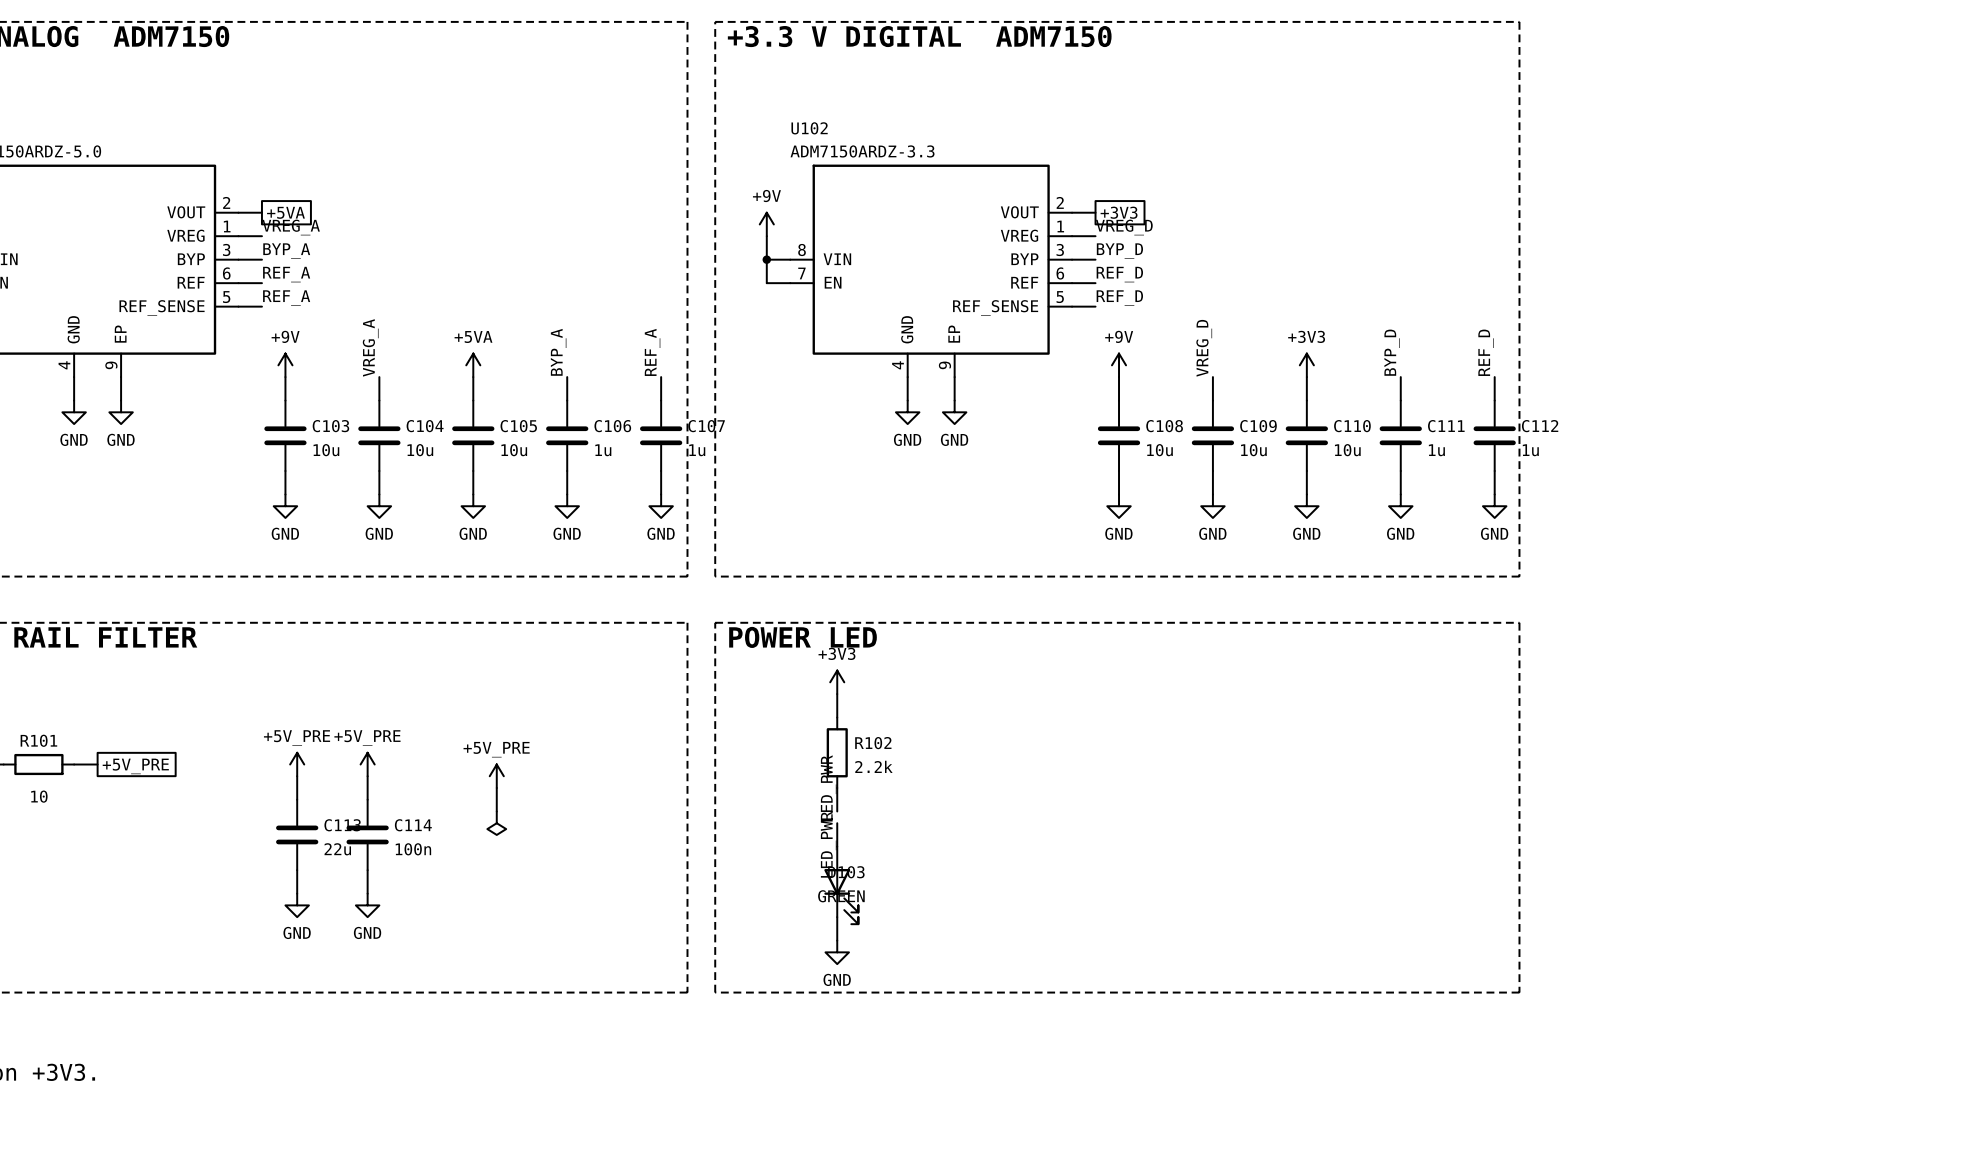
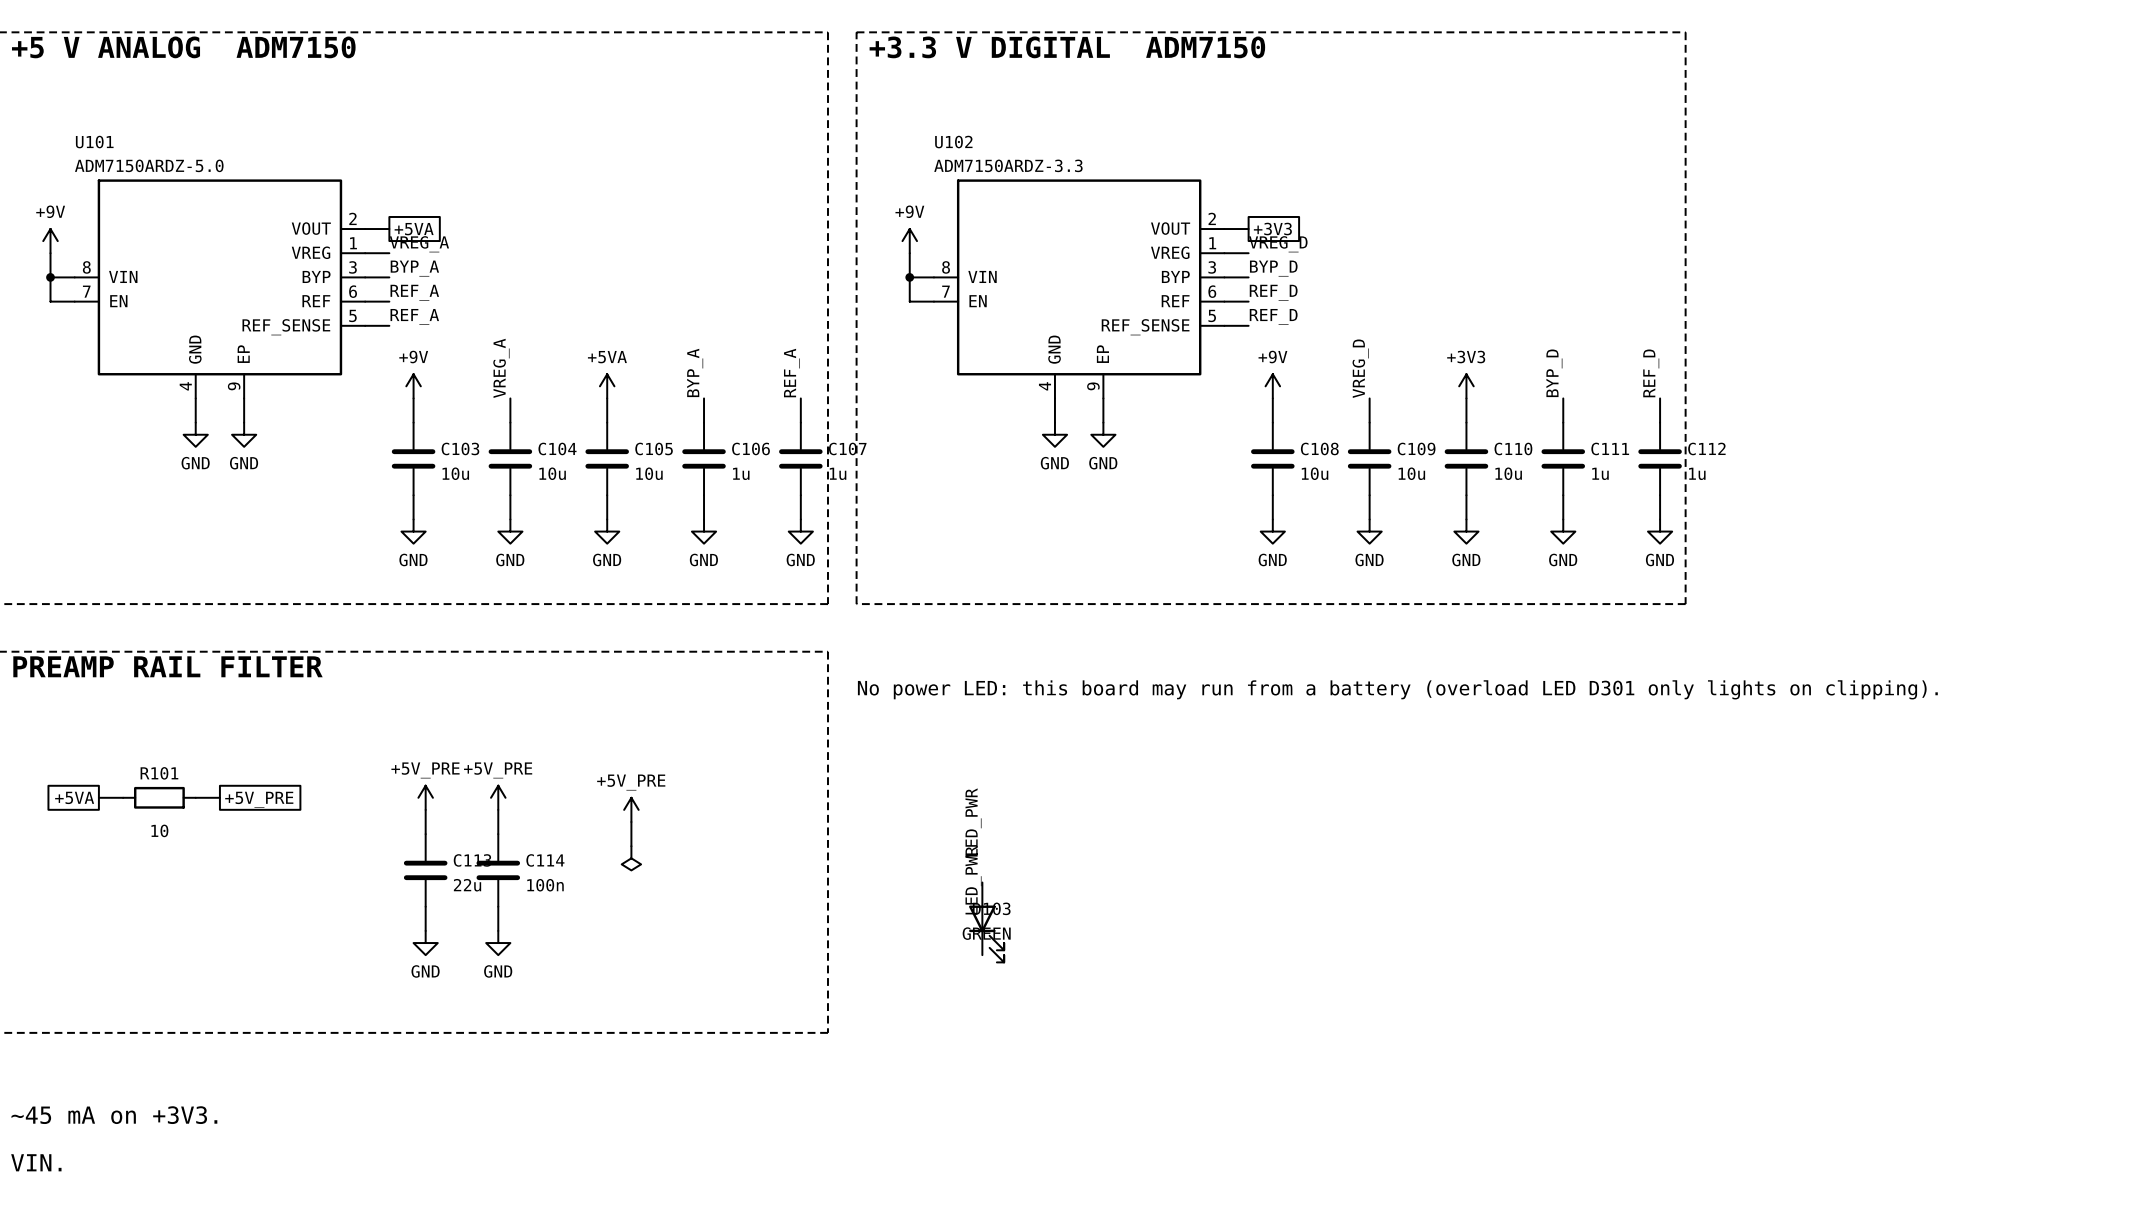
line: (715, 622) (1519, 622) (1519, 992) (715, 992) (715, 622) -> none
text: POWER LED (803, 637) -> none
text: none -> No power LED: this board may run from a battery (overload LED D301 only lights on clipping). (1397, 689)
power symbol: +3V3 (837, 682) -> none
wire: (837, 694) (837, 717) -> none
R102: 2.2k (837, 752) -> none
wire: (837, 787) (837, 811) -> none
wire: (837, 823) (837, 846) -> none
wire: (837, 917) (837, 940) -> none
power symbol: GND (837, 952) -> none

